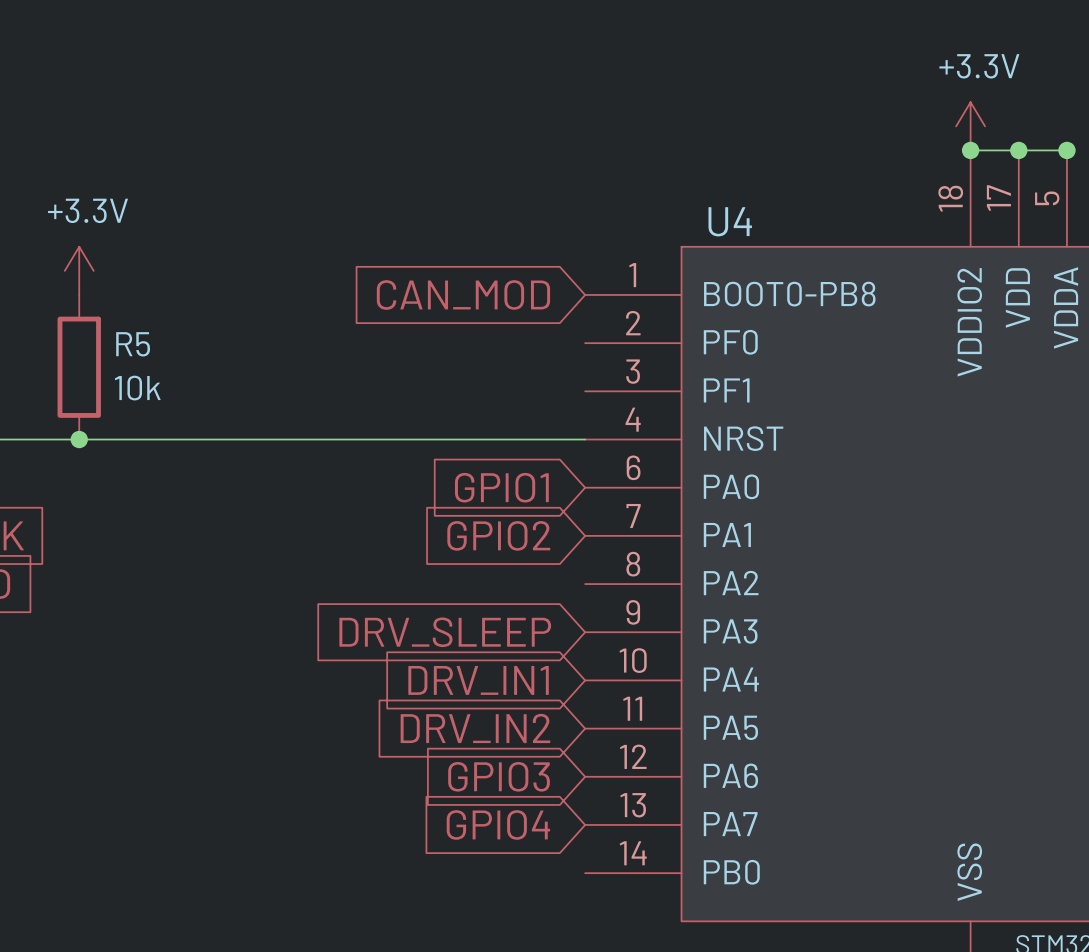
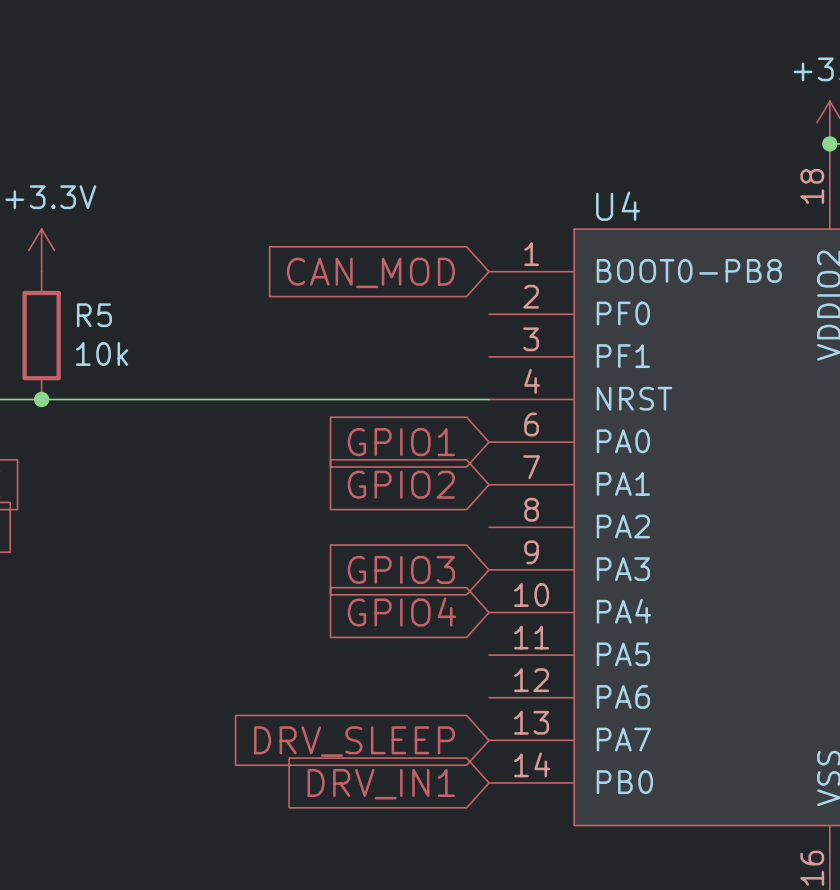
global label: DRV_SLEEP (445, 632) -> GPIO3 (401, 569)
global label: DRV_IN1 (478, 680) -> GPIO4 (401, 611)
global label: DRV_IN2 (475, 728) -> none
global label: GPIO3 (499, 776) -> none
global label: GPIO4 (498, 824) -> DRV_SLEEP (354, 741)
global label: none -> DRV_IN1 (381, 784)

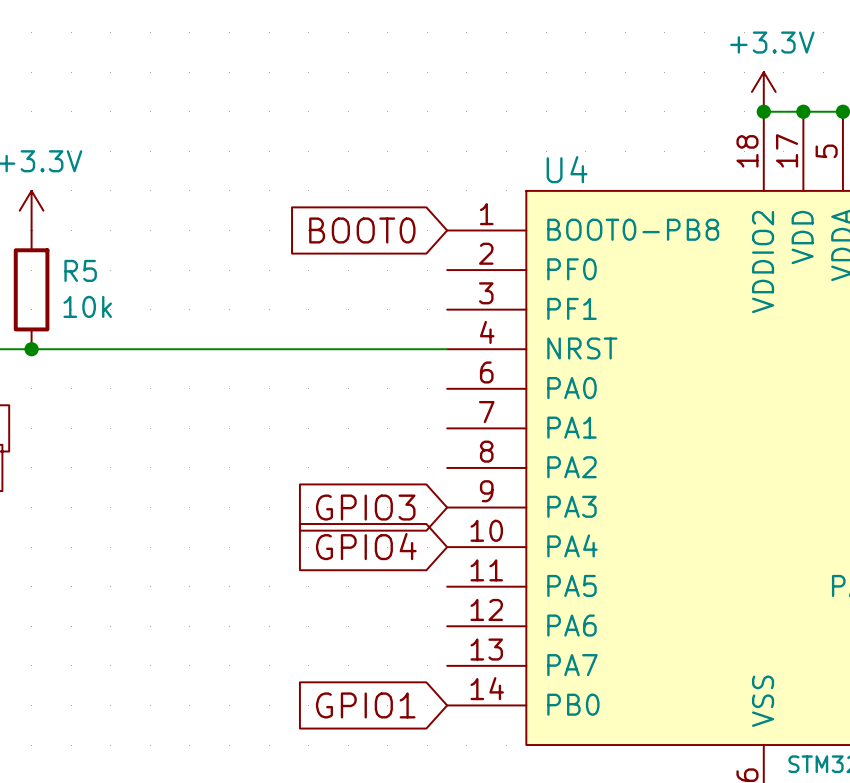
global label: CAN_MOD (370, 272) -> BOOT0 (362, 230)
global label: GPIO1 (401, 442) -> none
global label: GPIO2 (401, 484) -> none
global label: DRV_SLEEP (354, 741) -> none
global label: DRV_IN1 (381, 784) -> GPIO1 (365, 705)

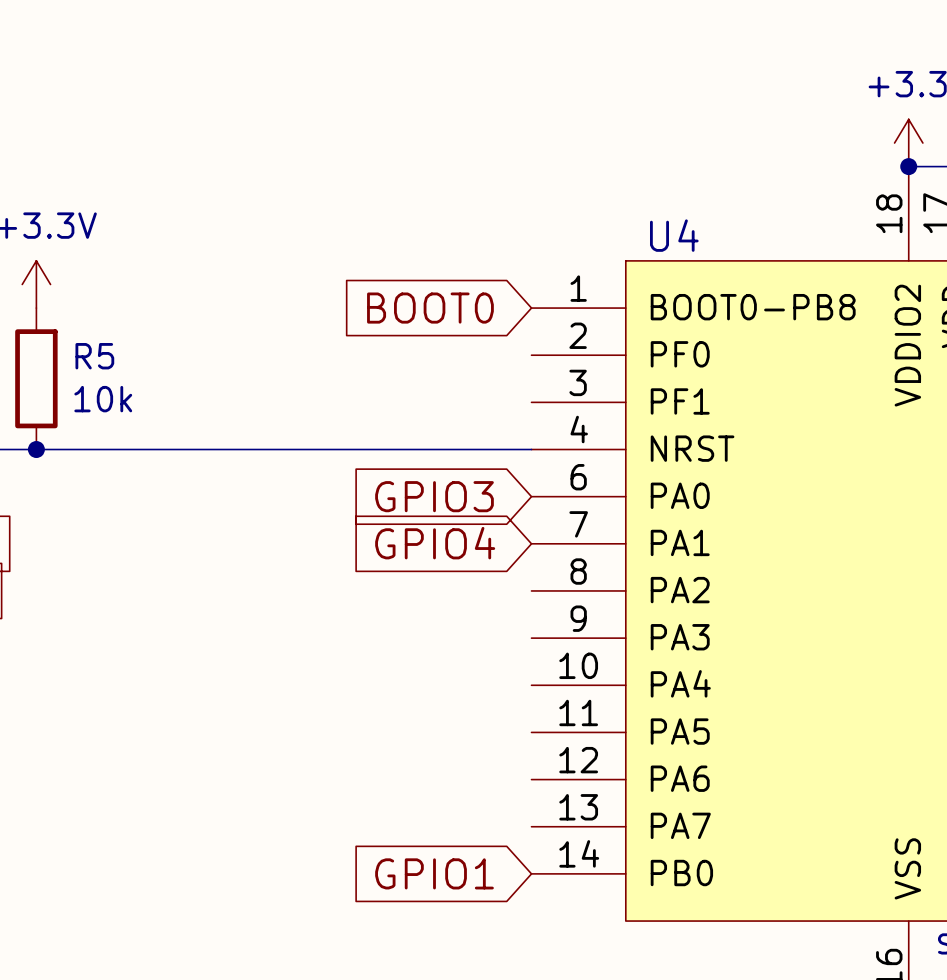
global label position: GPIO3 (365, 507) -> GPIO3 (434, 496)
global label position: GPIO4 (366, 546) -> GPIO4 (435, 543)

